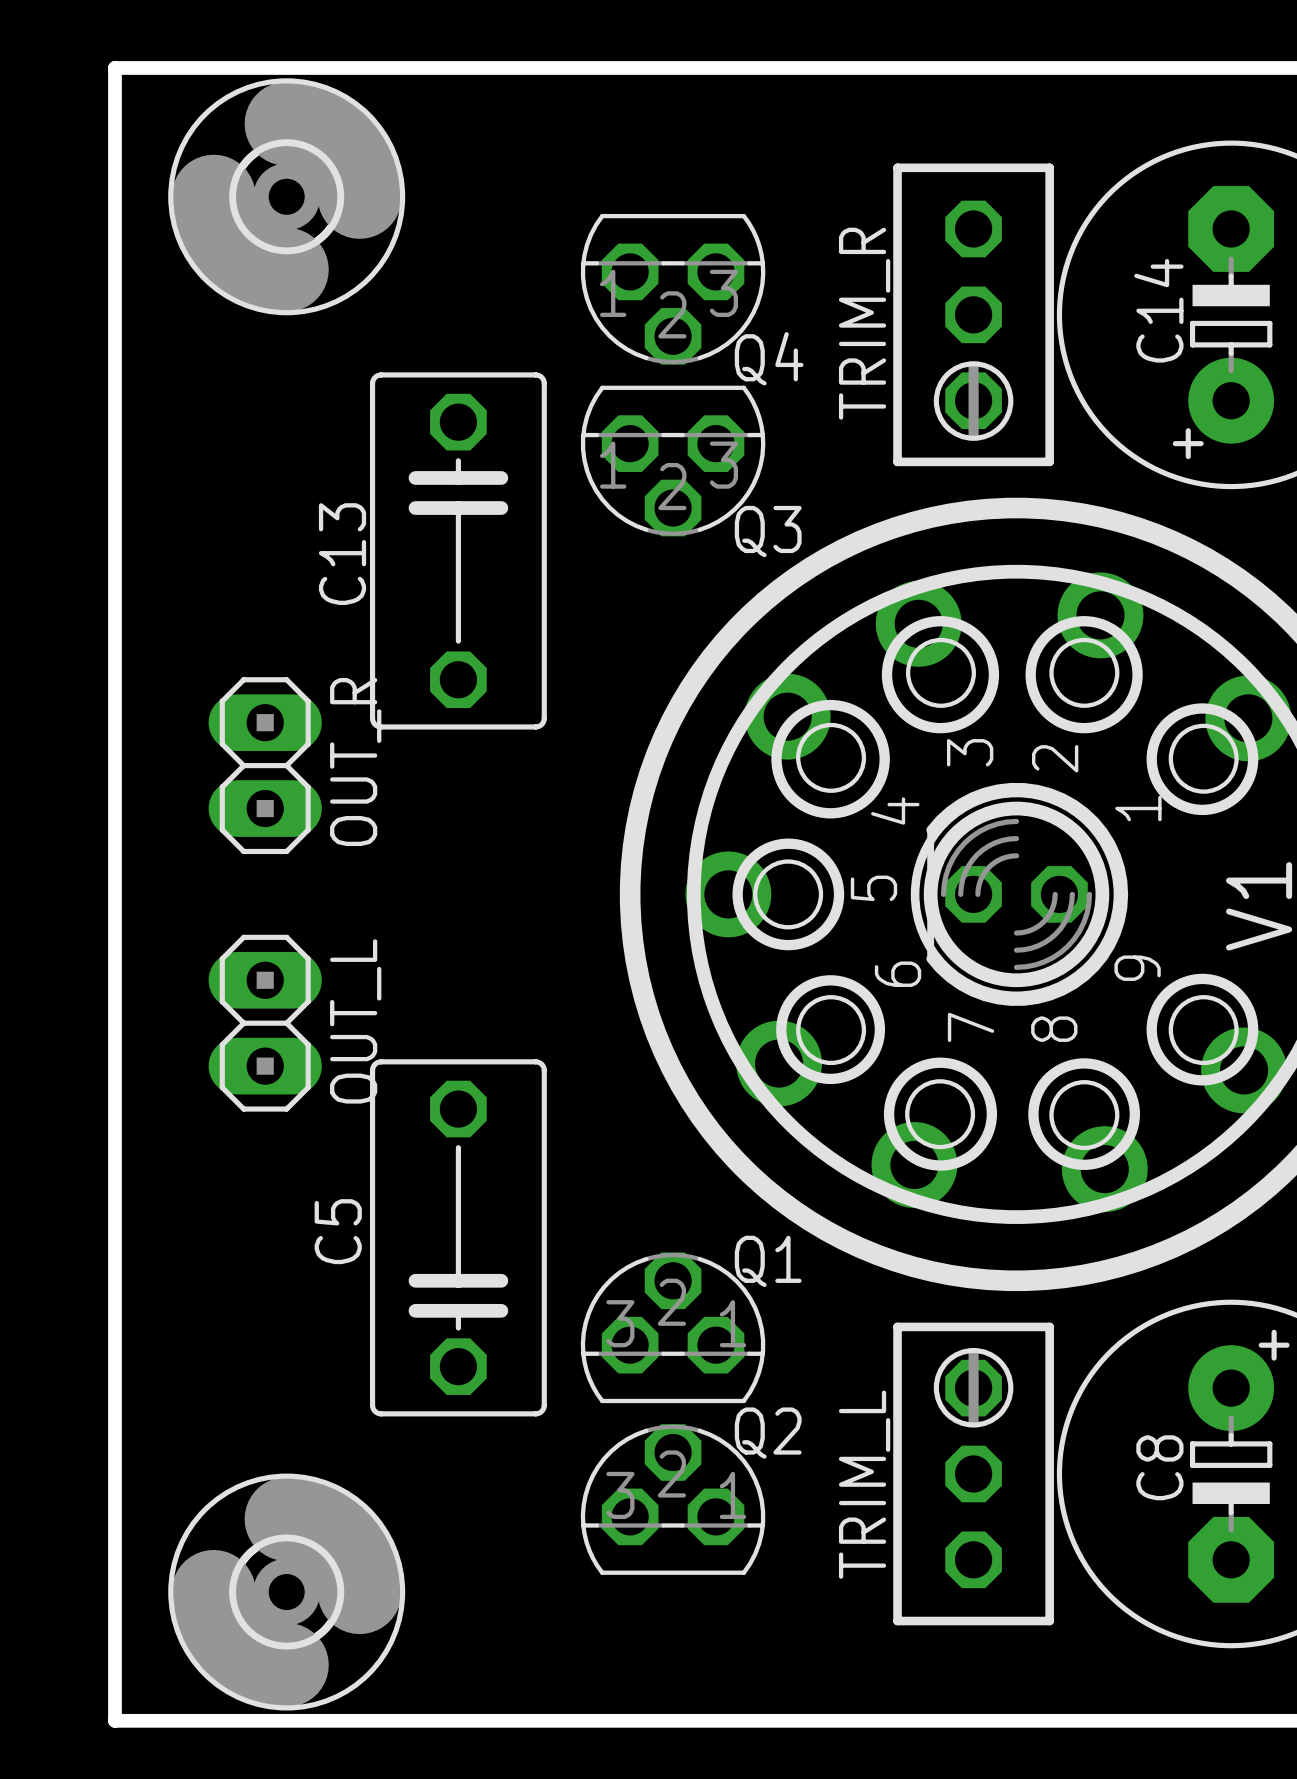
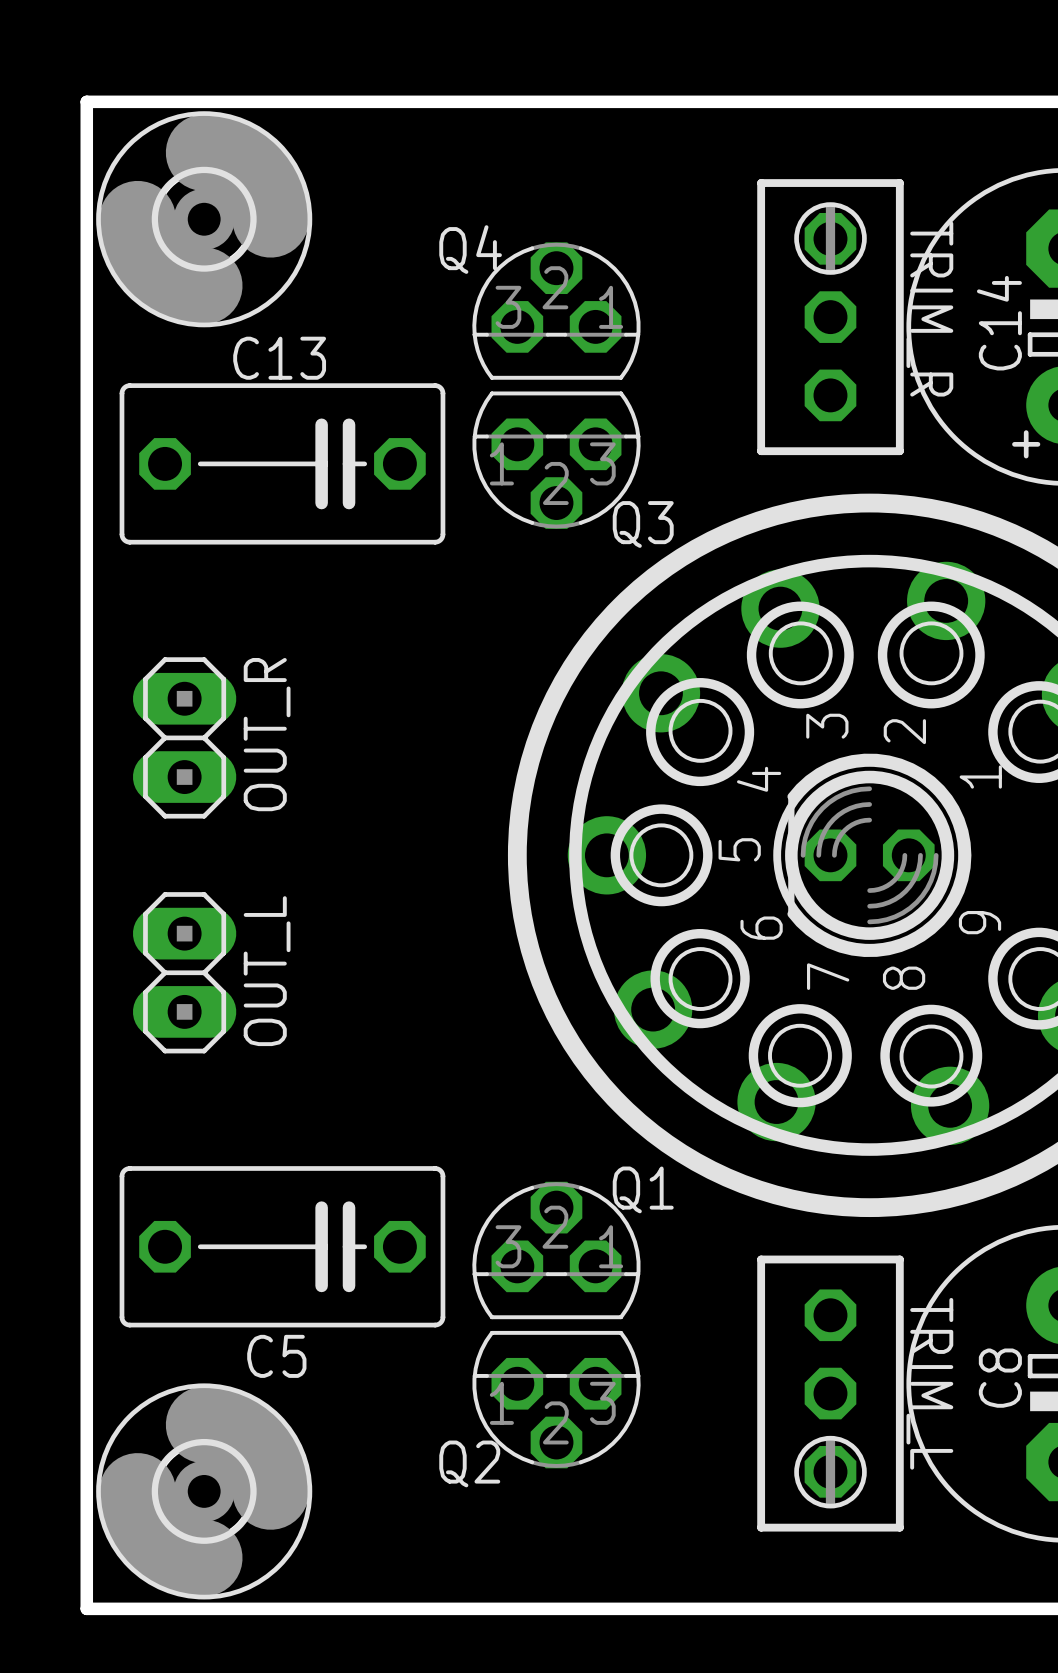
board edge: (157, 67) (114, 67) (114, 1720) (157, 1720) -> (86, 101) (86, 1608)
Q4 footprint: [580, 213, 766, 365] -> [472, 242, 641, 380]
TRIM_R rotation: 0° (973, 314) -> 180° (830, 317)
Q4 name position: Q4 (769, 358) -> Q4 (470, 249)
C13 rotation: 0° (458, 550) -> 90° clockwise (282, 463)
C5 rotation: 0° (458, 1237) -> 90° counterclockwise (282, 1246)
Q2 footprint: [580, 1424, 766, 1575] -> [472, 1330, 641, 1469]
Q2 name position: Q2 (768, 1433) -> Q2 (469, 1463)
TRIM_L rotation: 0° (973, 1473) -> 180° (830, 1393)

